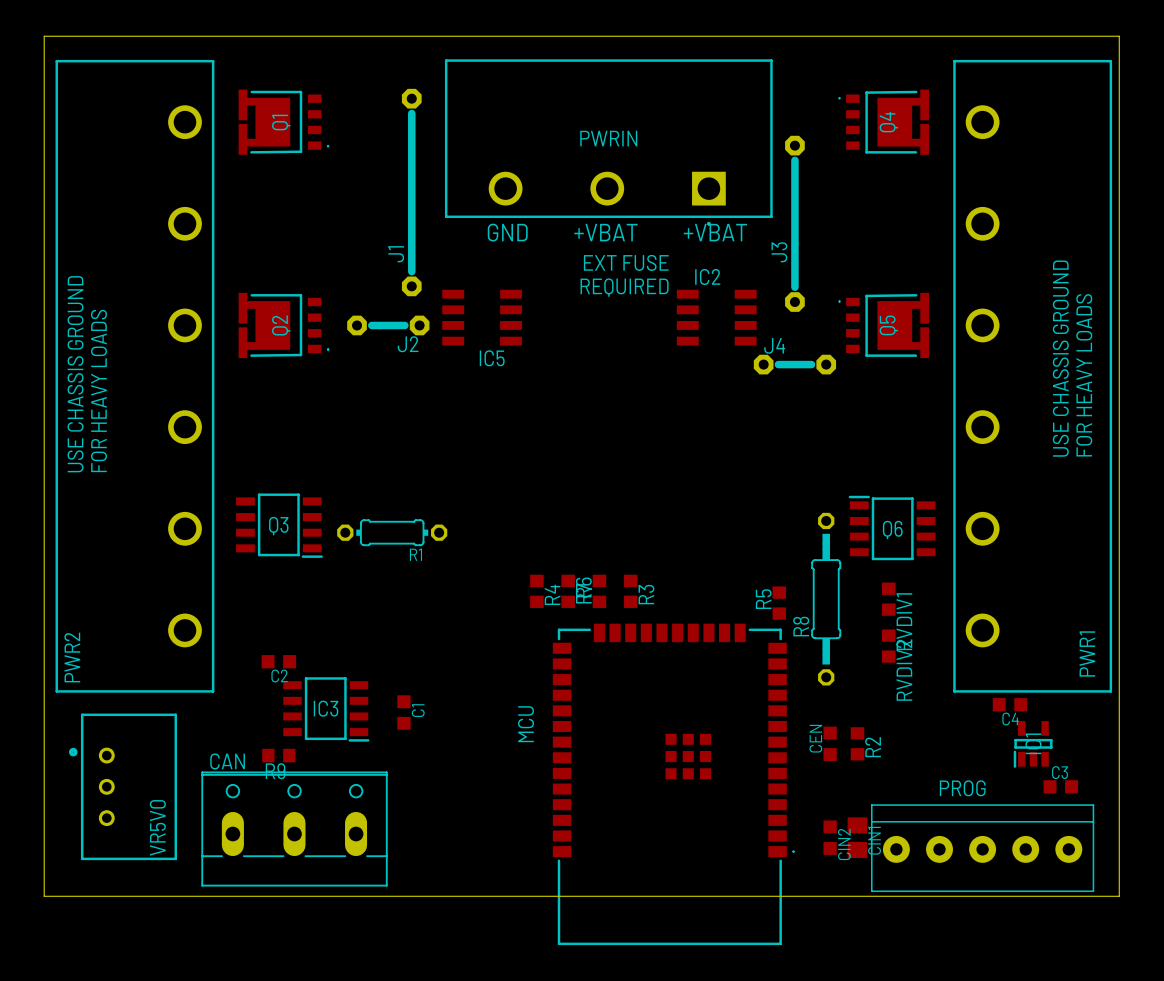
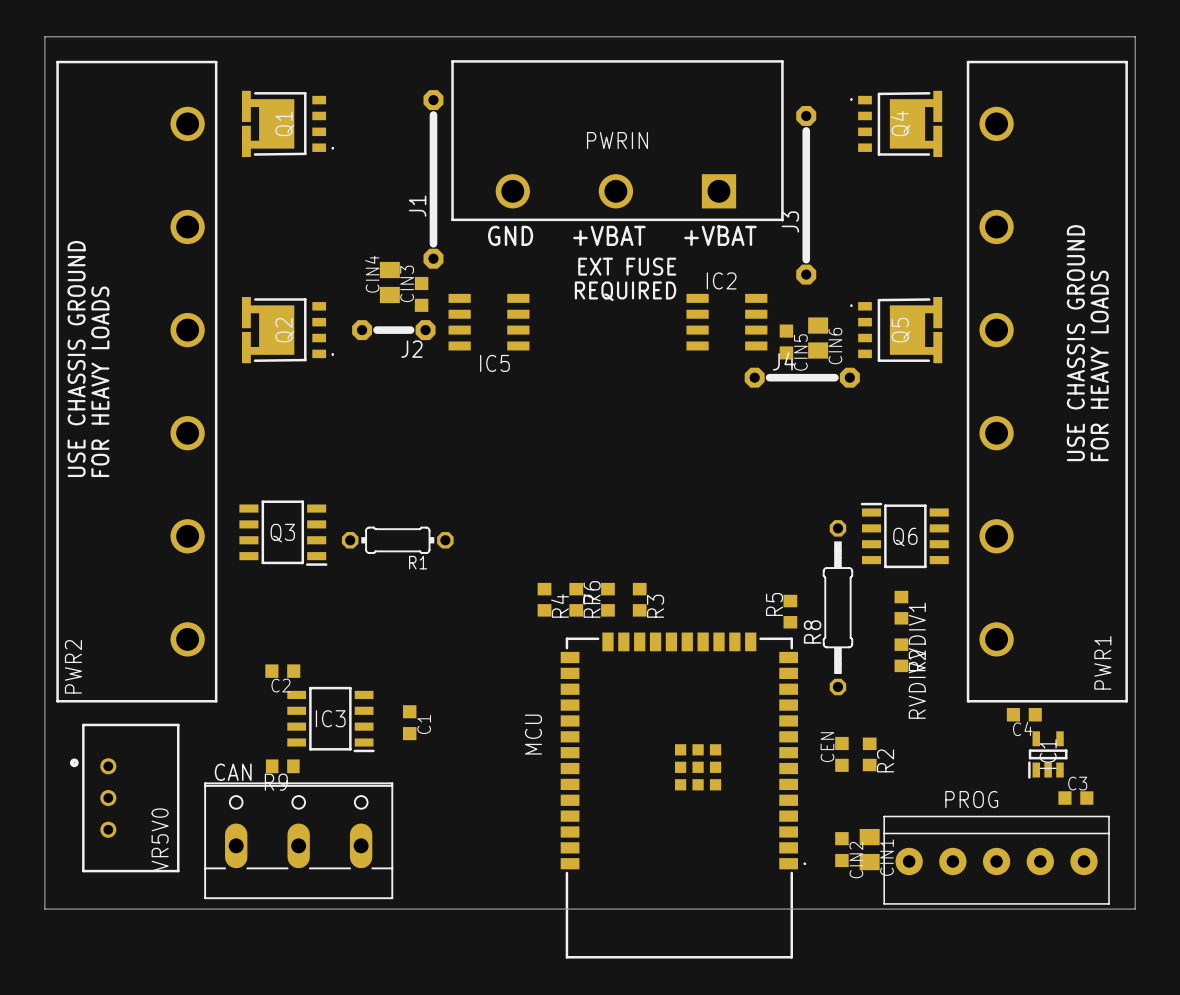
J1 footprint: [401, 88, 422, 297] -> [423, 90, 444, 269]
J3 position: (794, 223) -> (806, 195)
J1 name position: J1 (396, 254) -> J1 (417, 206)
CIN4: none -> (389, 282)
CIN3: none -> (421, 294)
CIN6: none -> (818, 338)
CIN5: none -> (786, 341)
J4 footprint: [753, 354, 837, 375] -> [744, 367, 860, 388]

